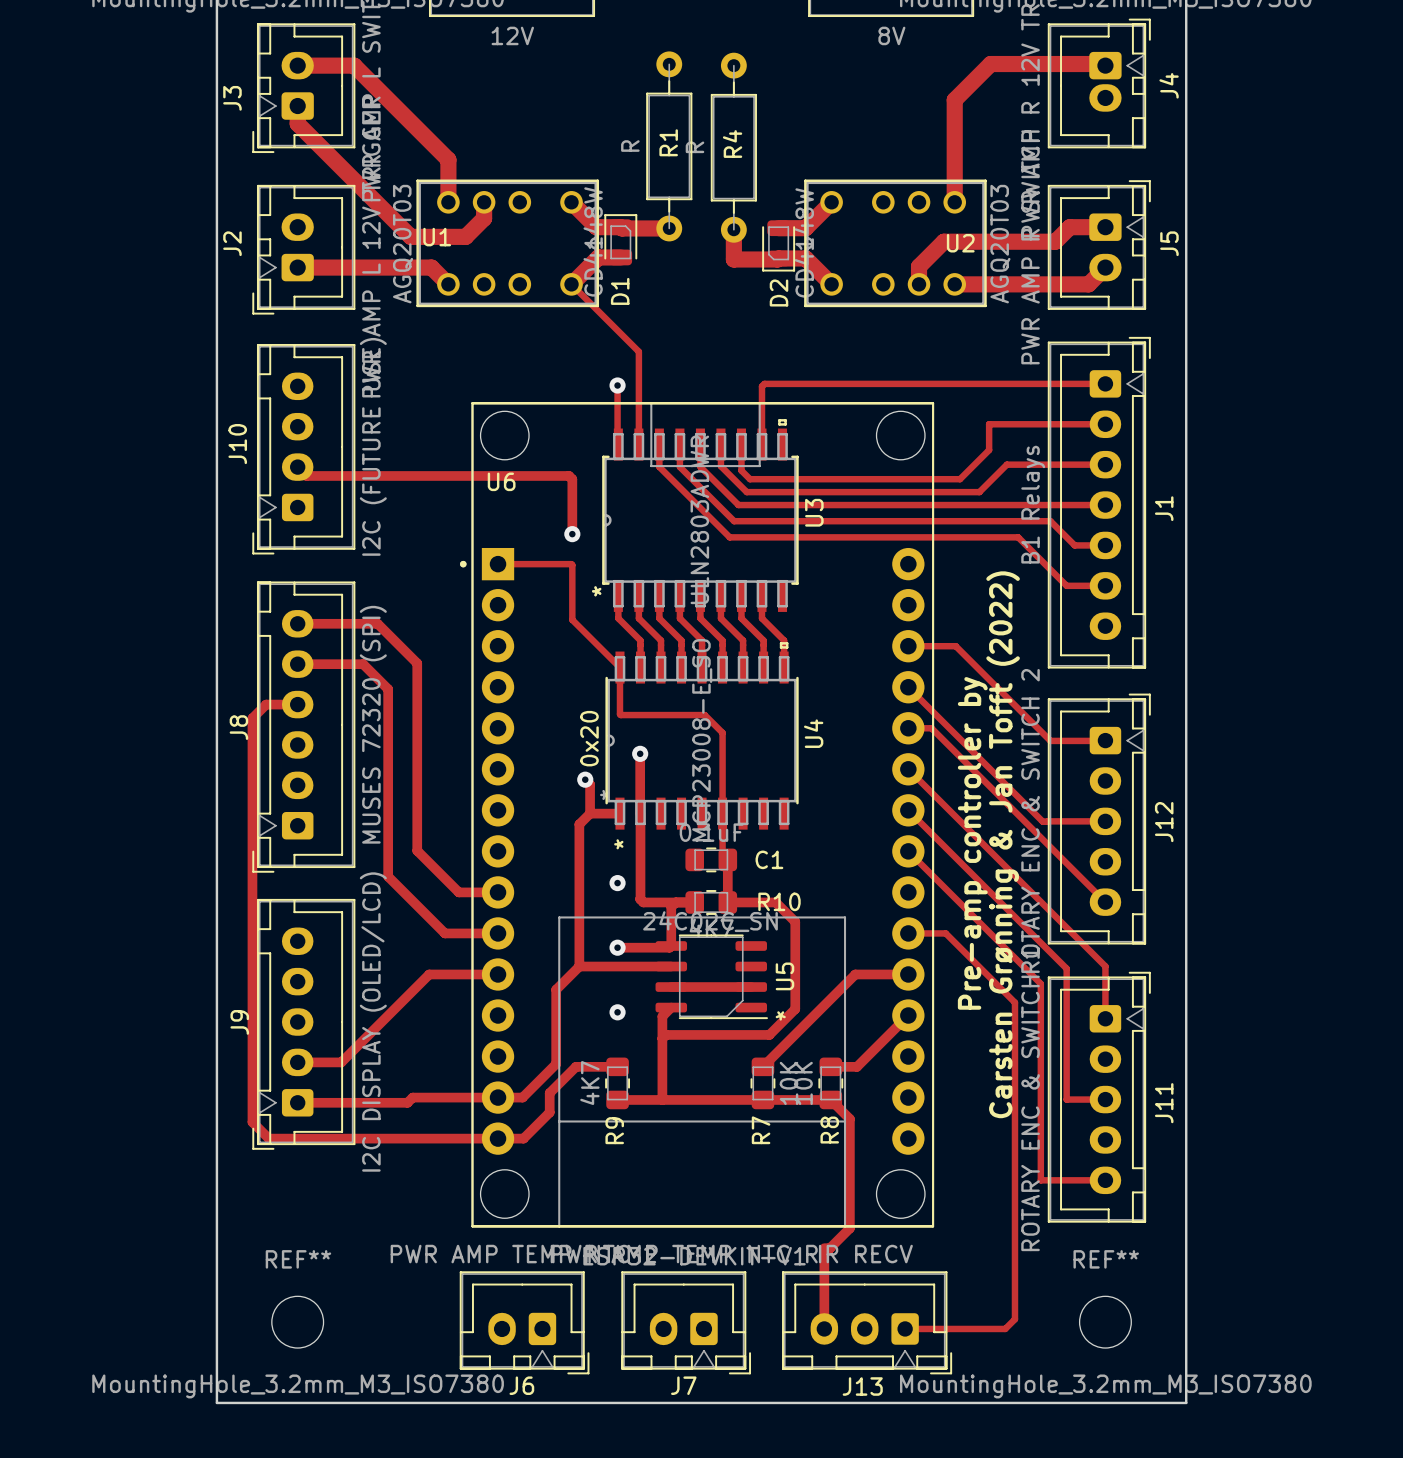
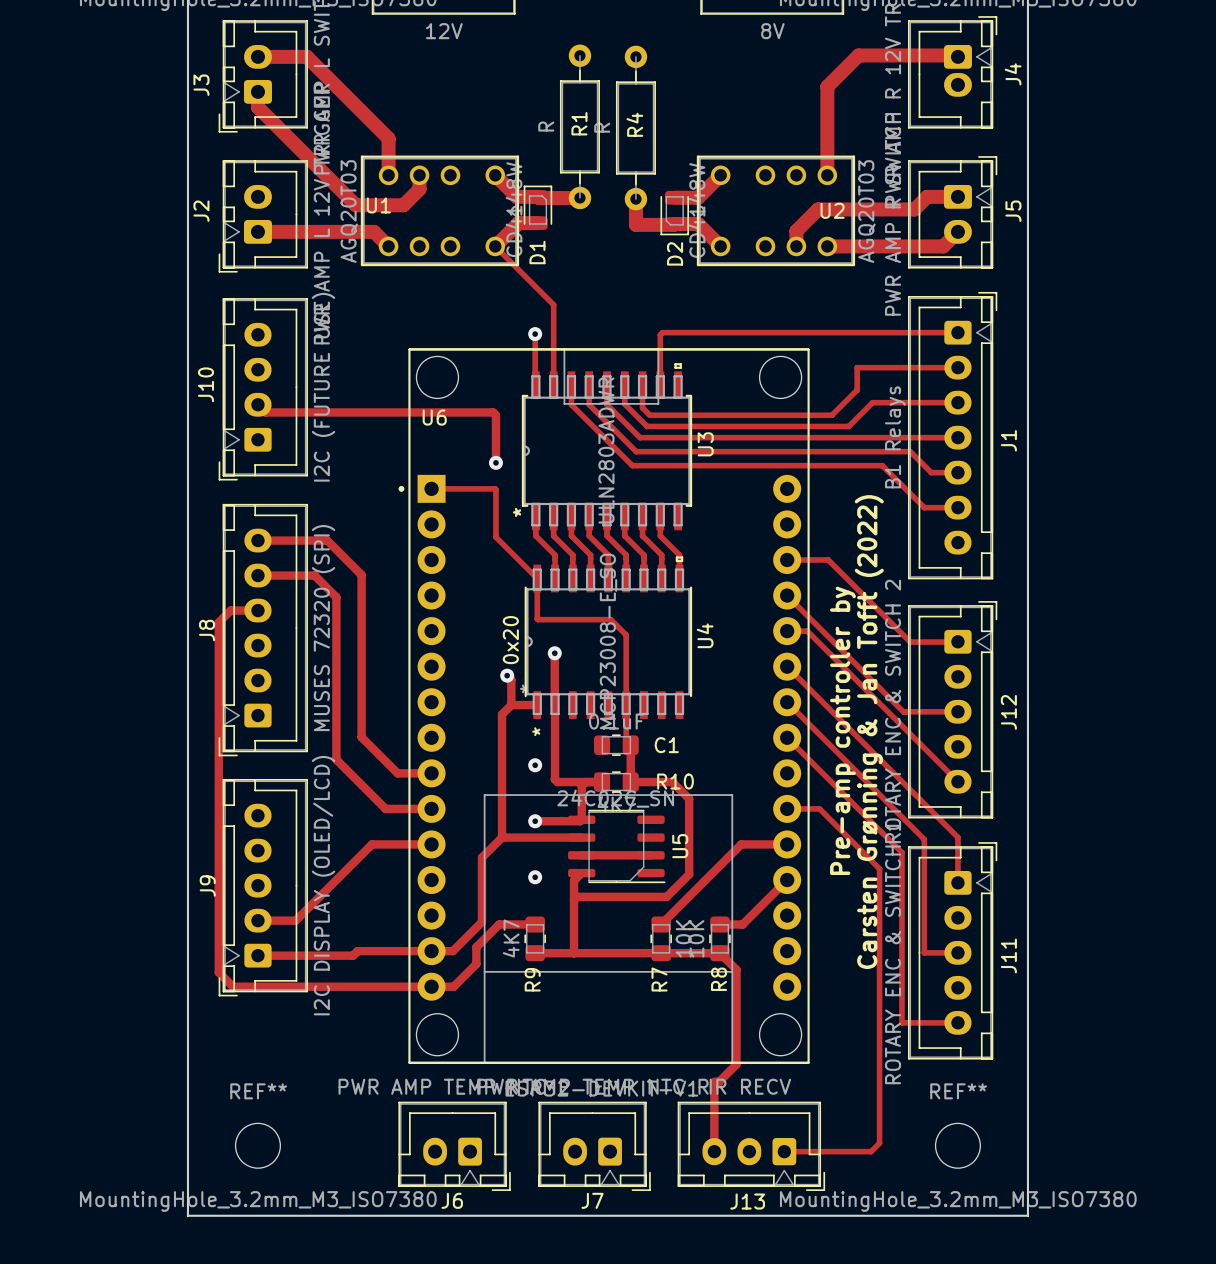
U5 text: * (780, 1015) -> none

